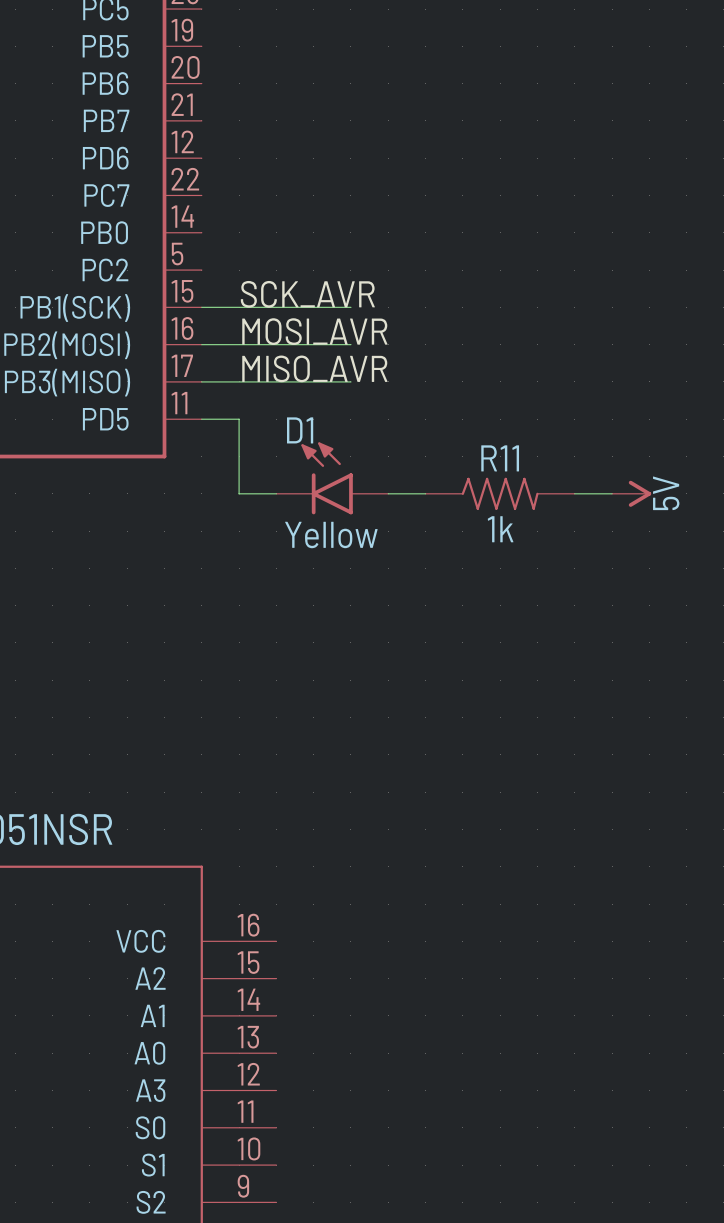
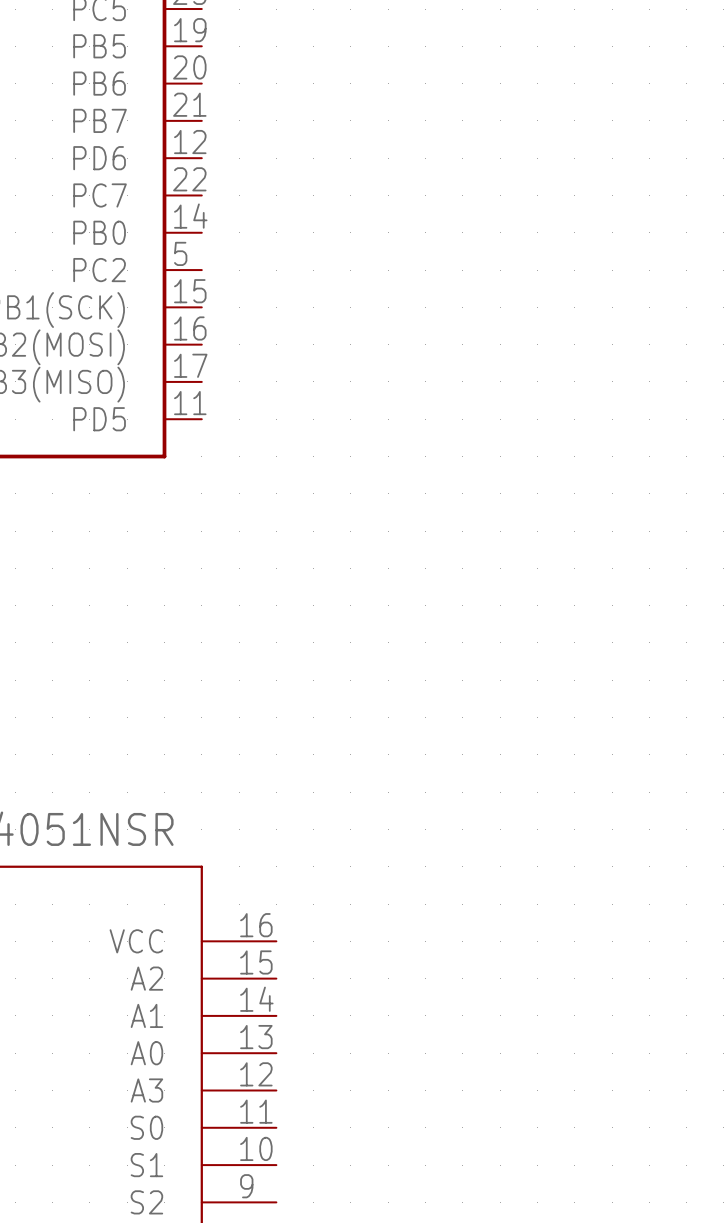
label: SCK_AVR (307, 294) -> none
wire: (201, 307) (350, 307) -> none
label: MOSI_AVR (314, 331) -> none
wire: (201, 344) (350, 344) -> none
label: MISO_AVR (314, 368) -> none
wire: (201, 381) (350, 381) -> none
wire: (201, 419) (239, 419) (239, 493) (276, 493) -> none
D1: Yellow (332, 478) -> none
wire: (388, 493) (425, 493) -> none
R11: 1k (500, 493) -> none
wire: (574, 493) (612, 493) -> none
power symbol: 5V (631, 493) -> none

